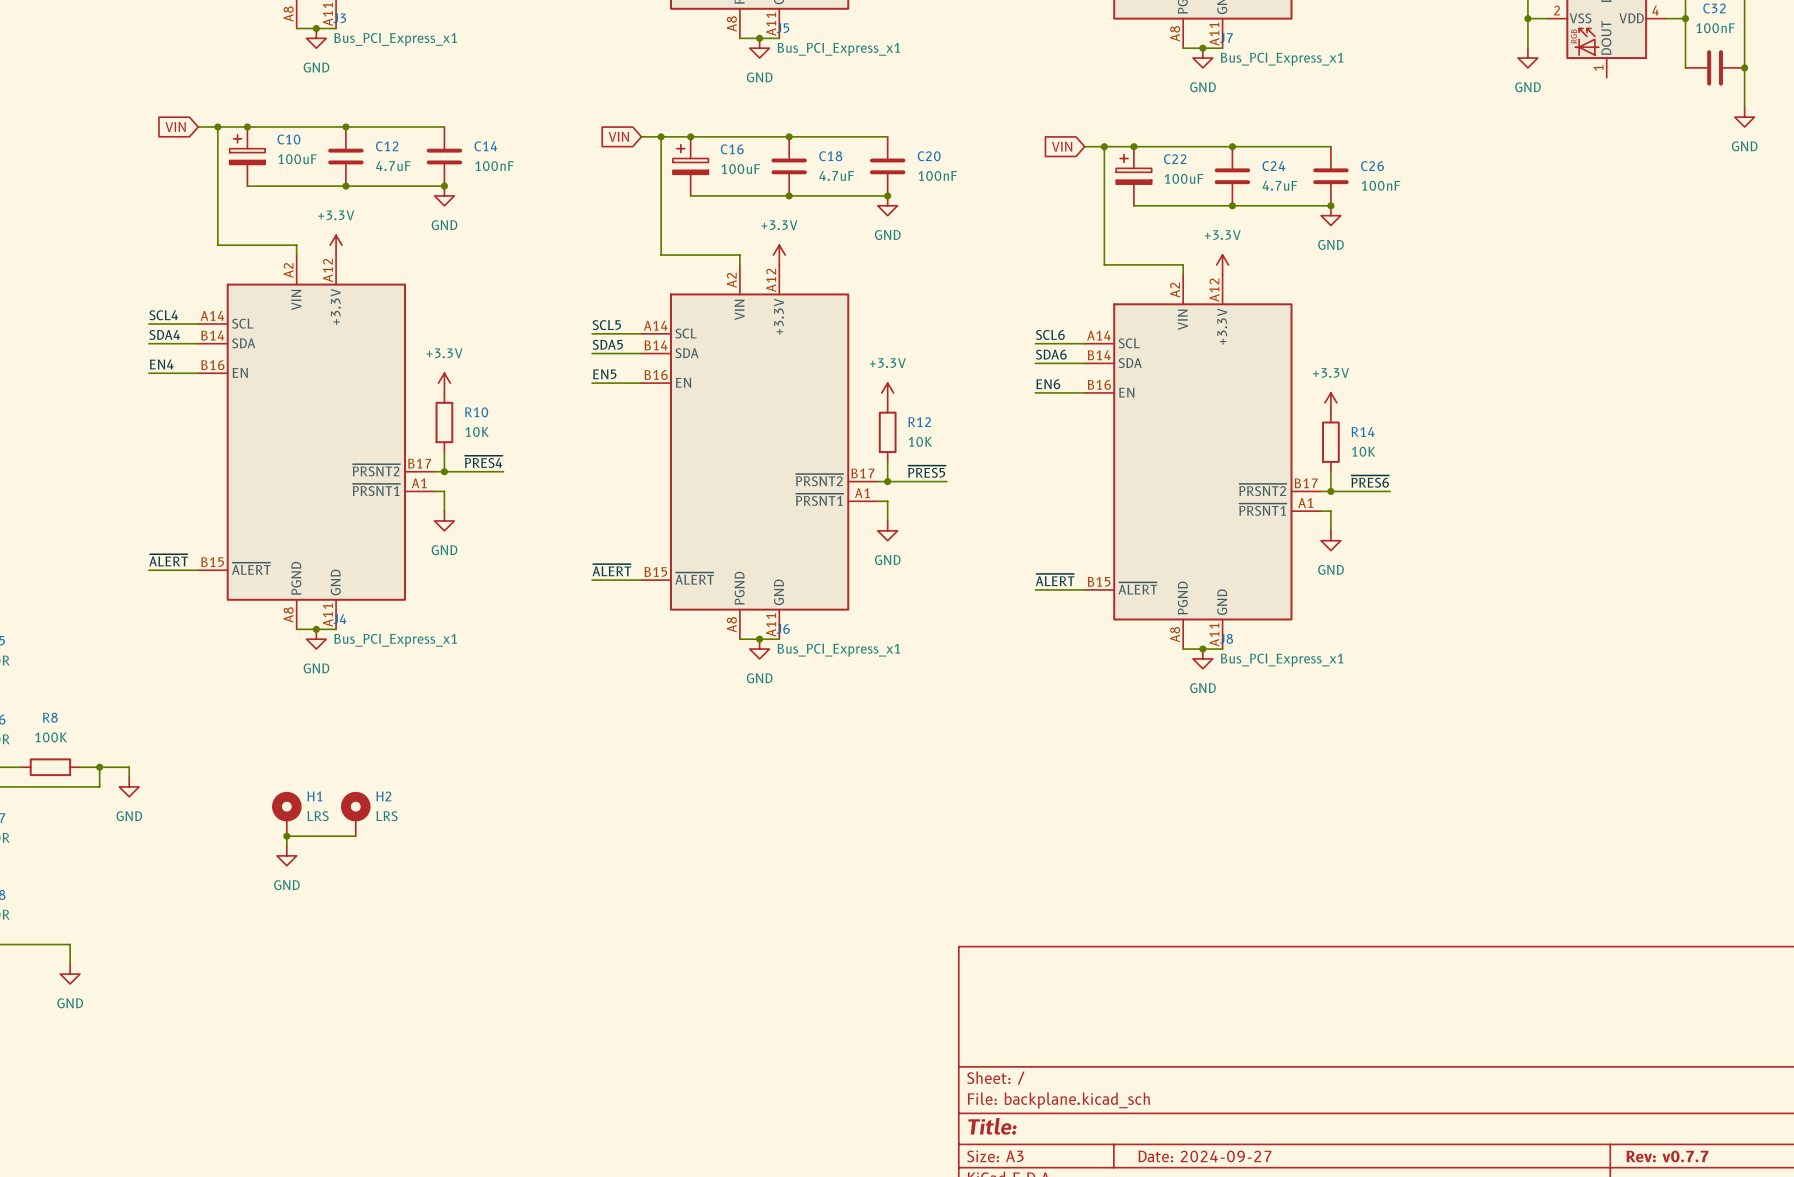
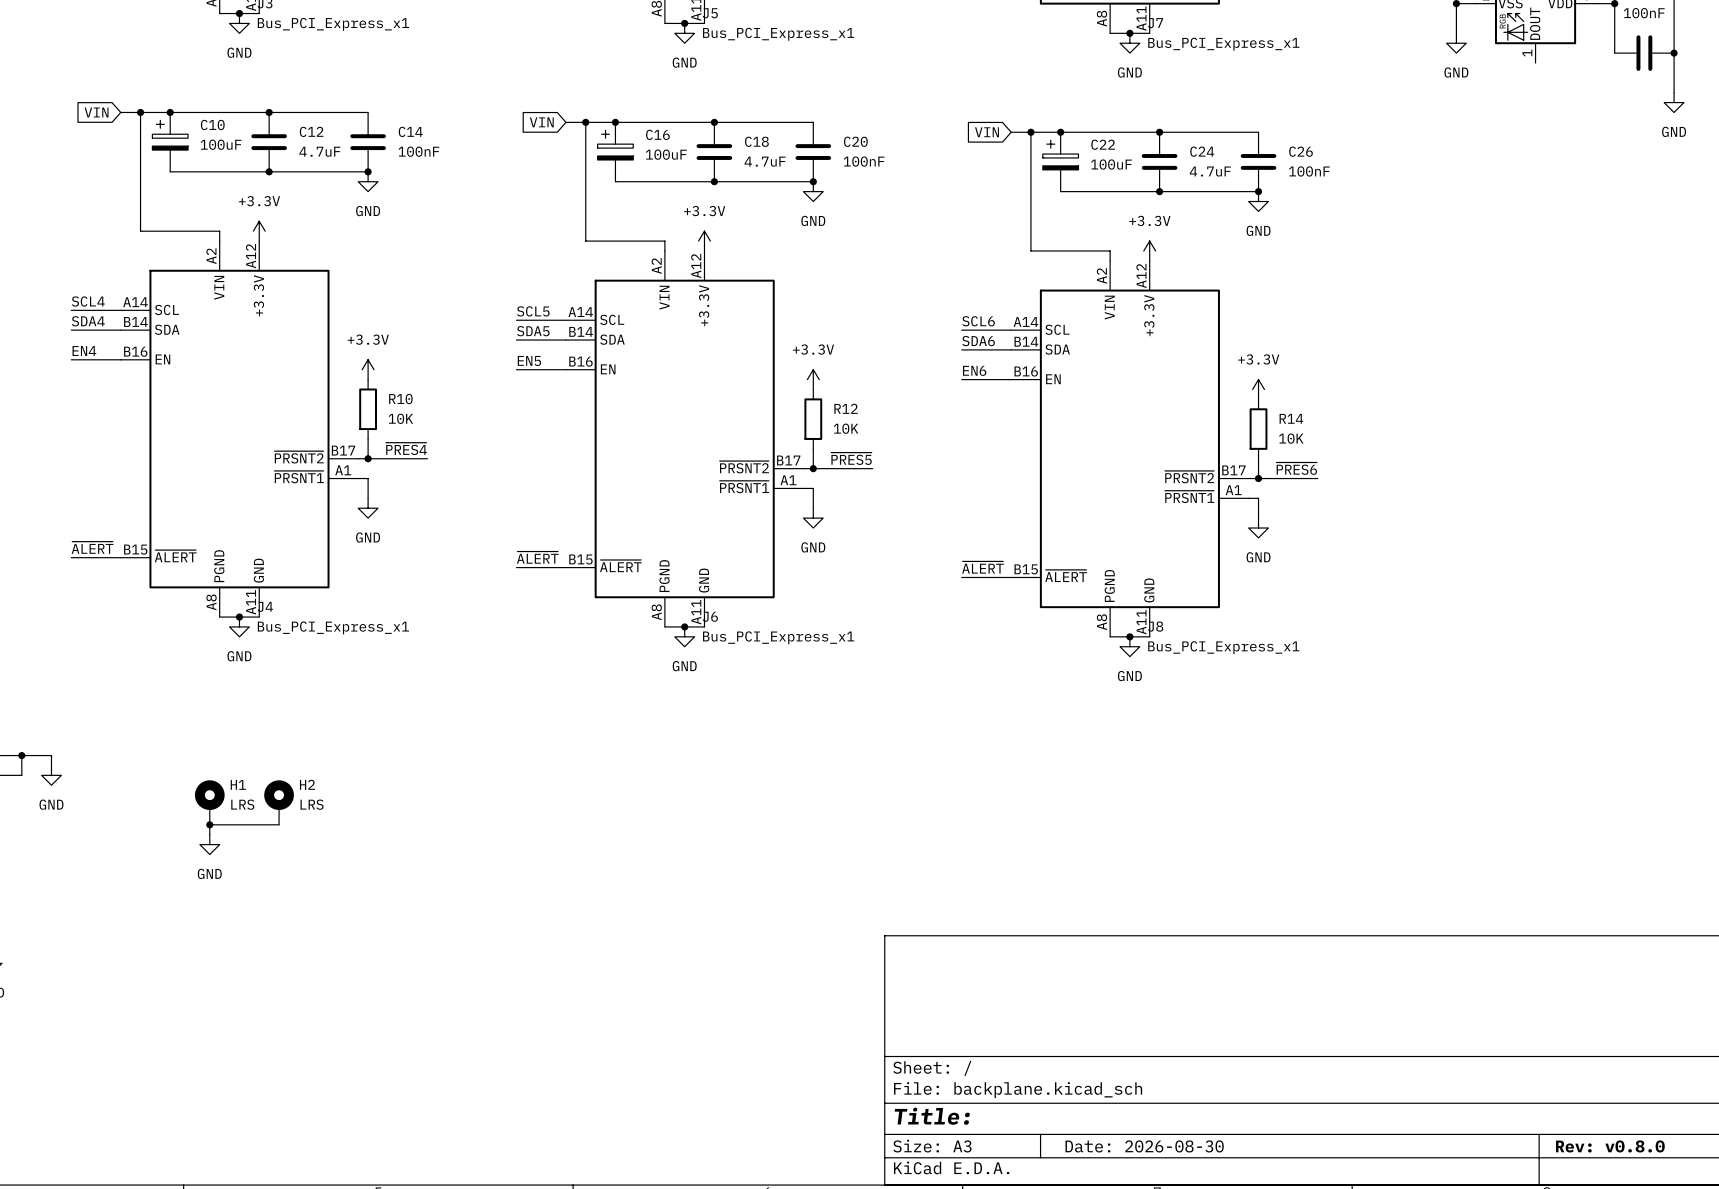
title block: Date: 2024-09-27 (1204, 1156) -> Date: 2026-08-30 (1144, 1146)
title block: Rev: v0.7.7 (1667, 1156) -> Rev: v0.8.0 (1610, 1146)

